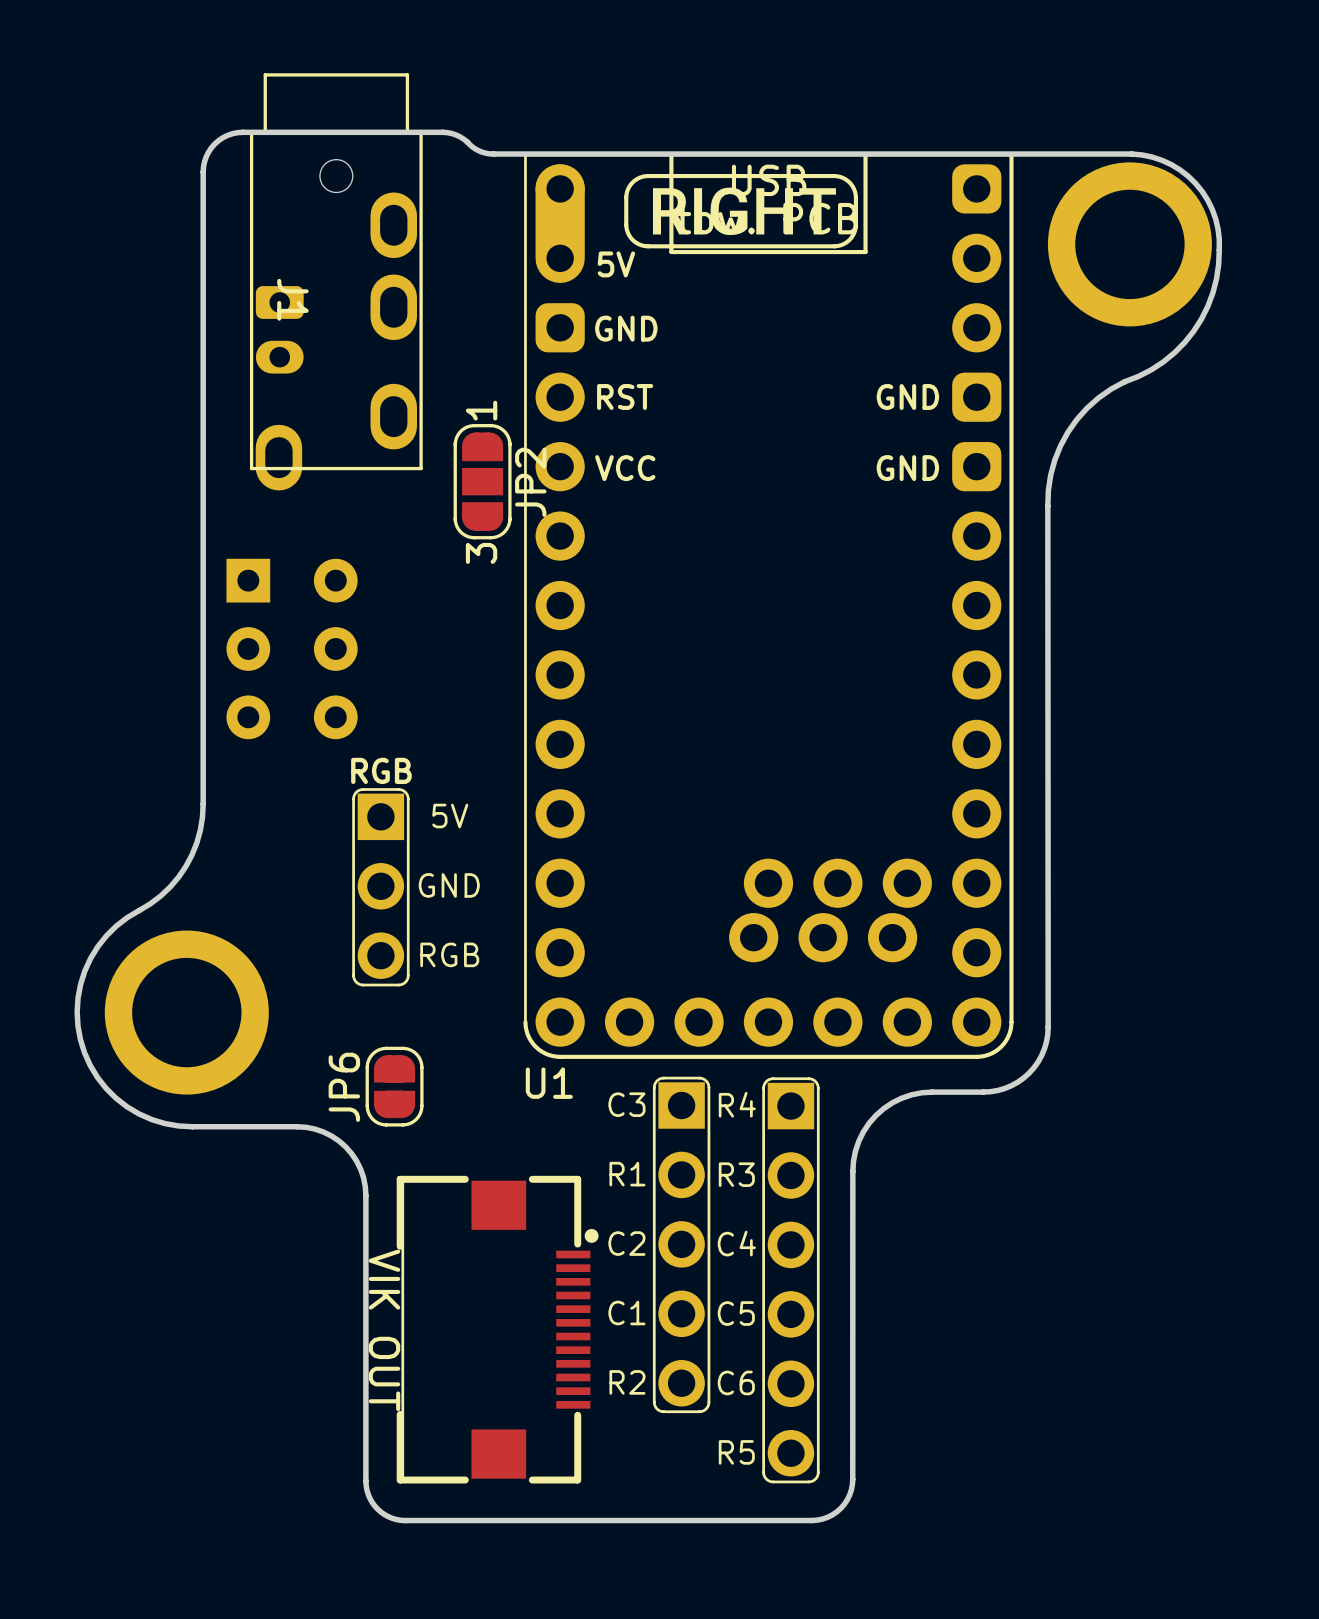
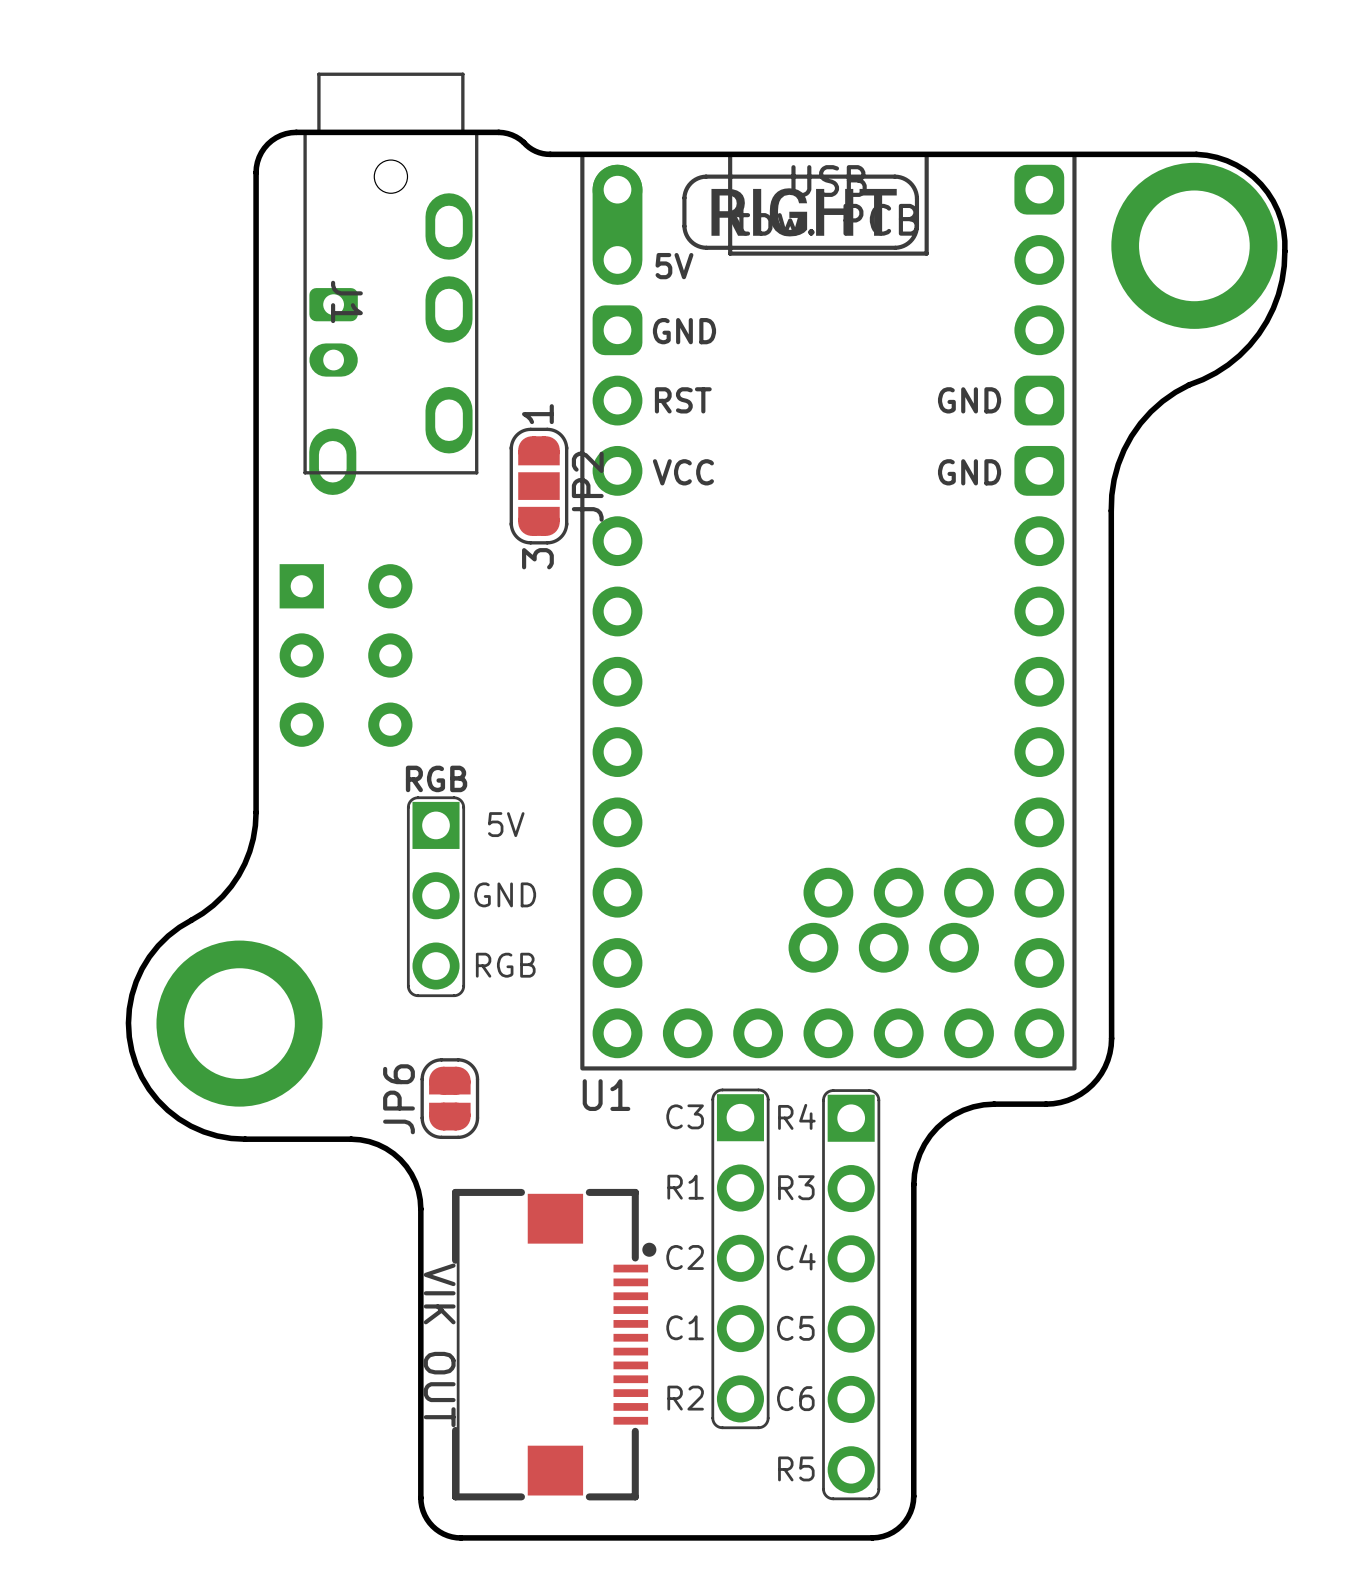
U1 footprint: [523, 152, 1014, 1059] -> [580, 152, 1077, 1071]

